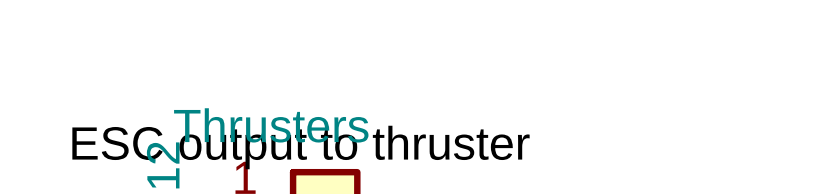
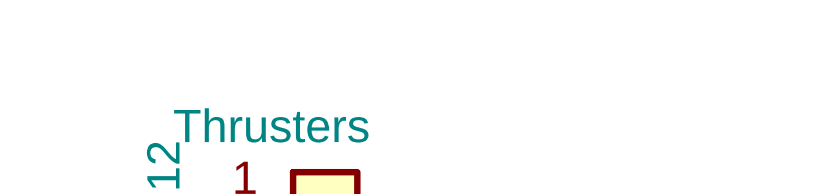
label: ESC output to thruster (300, 147) -> none

